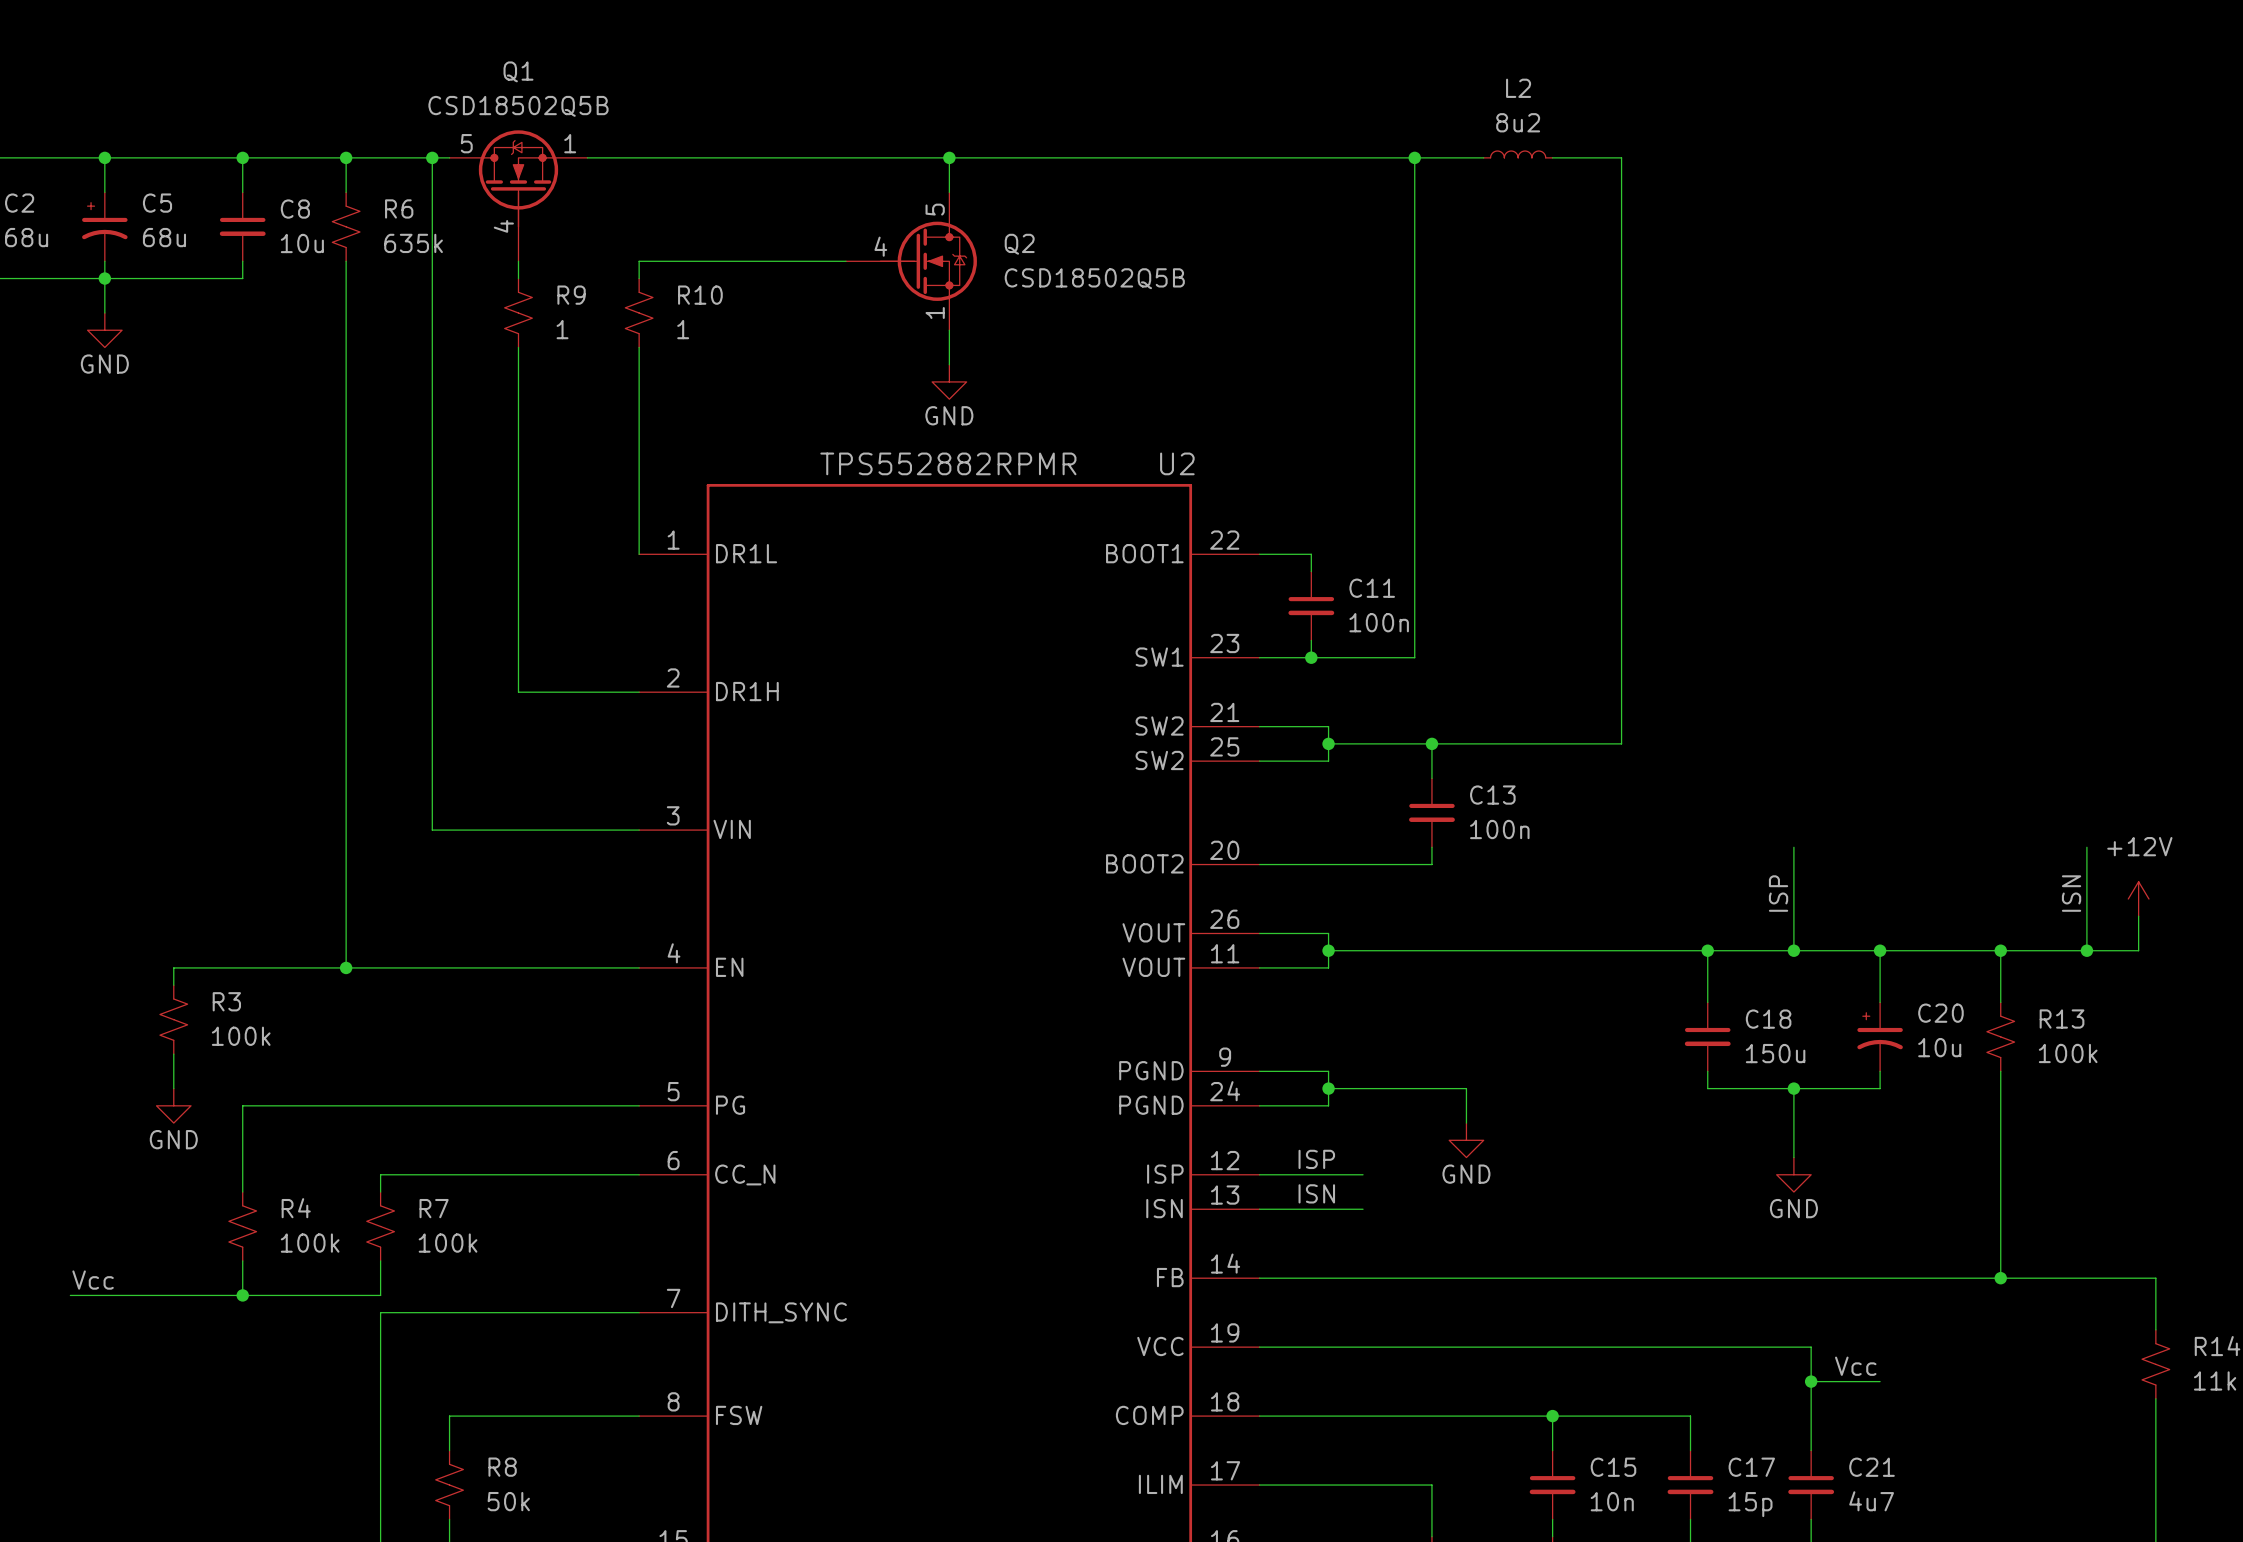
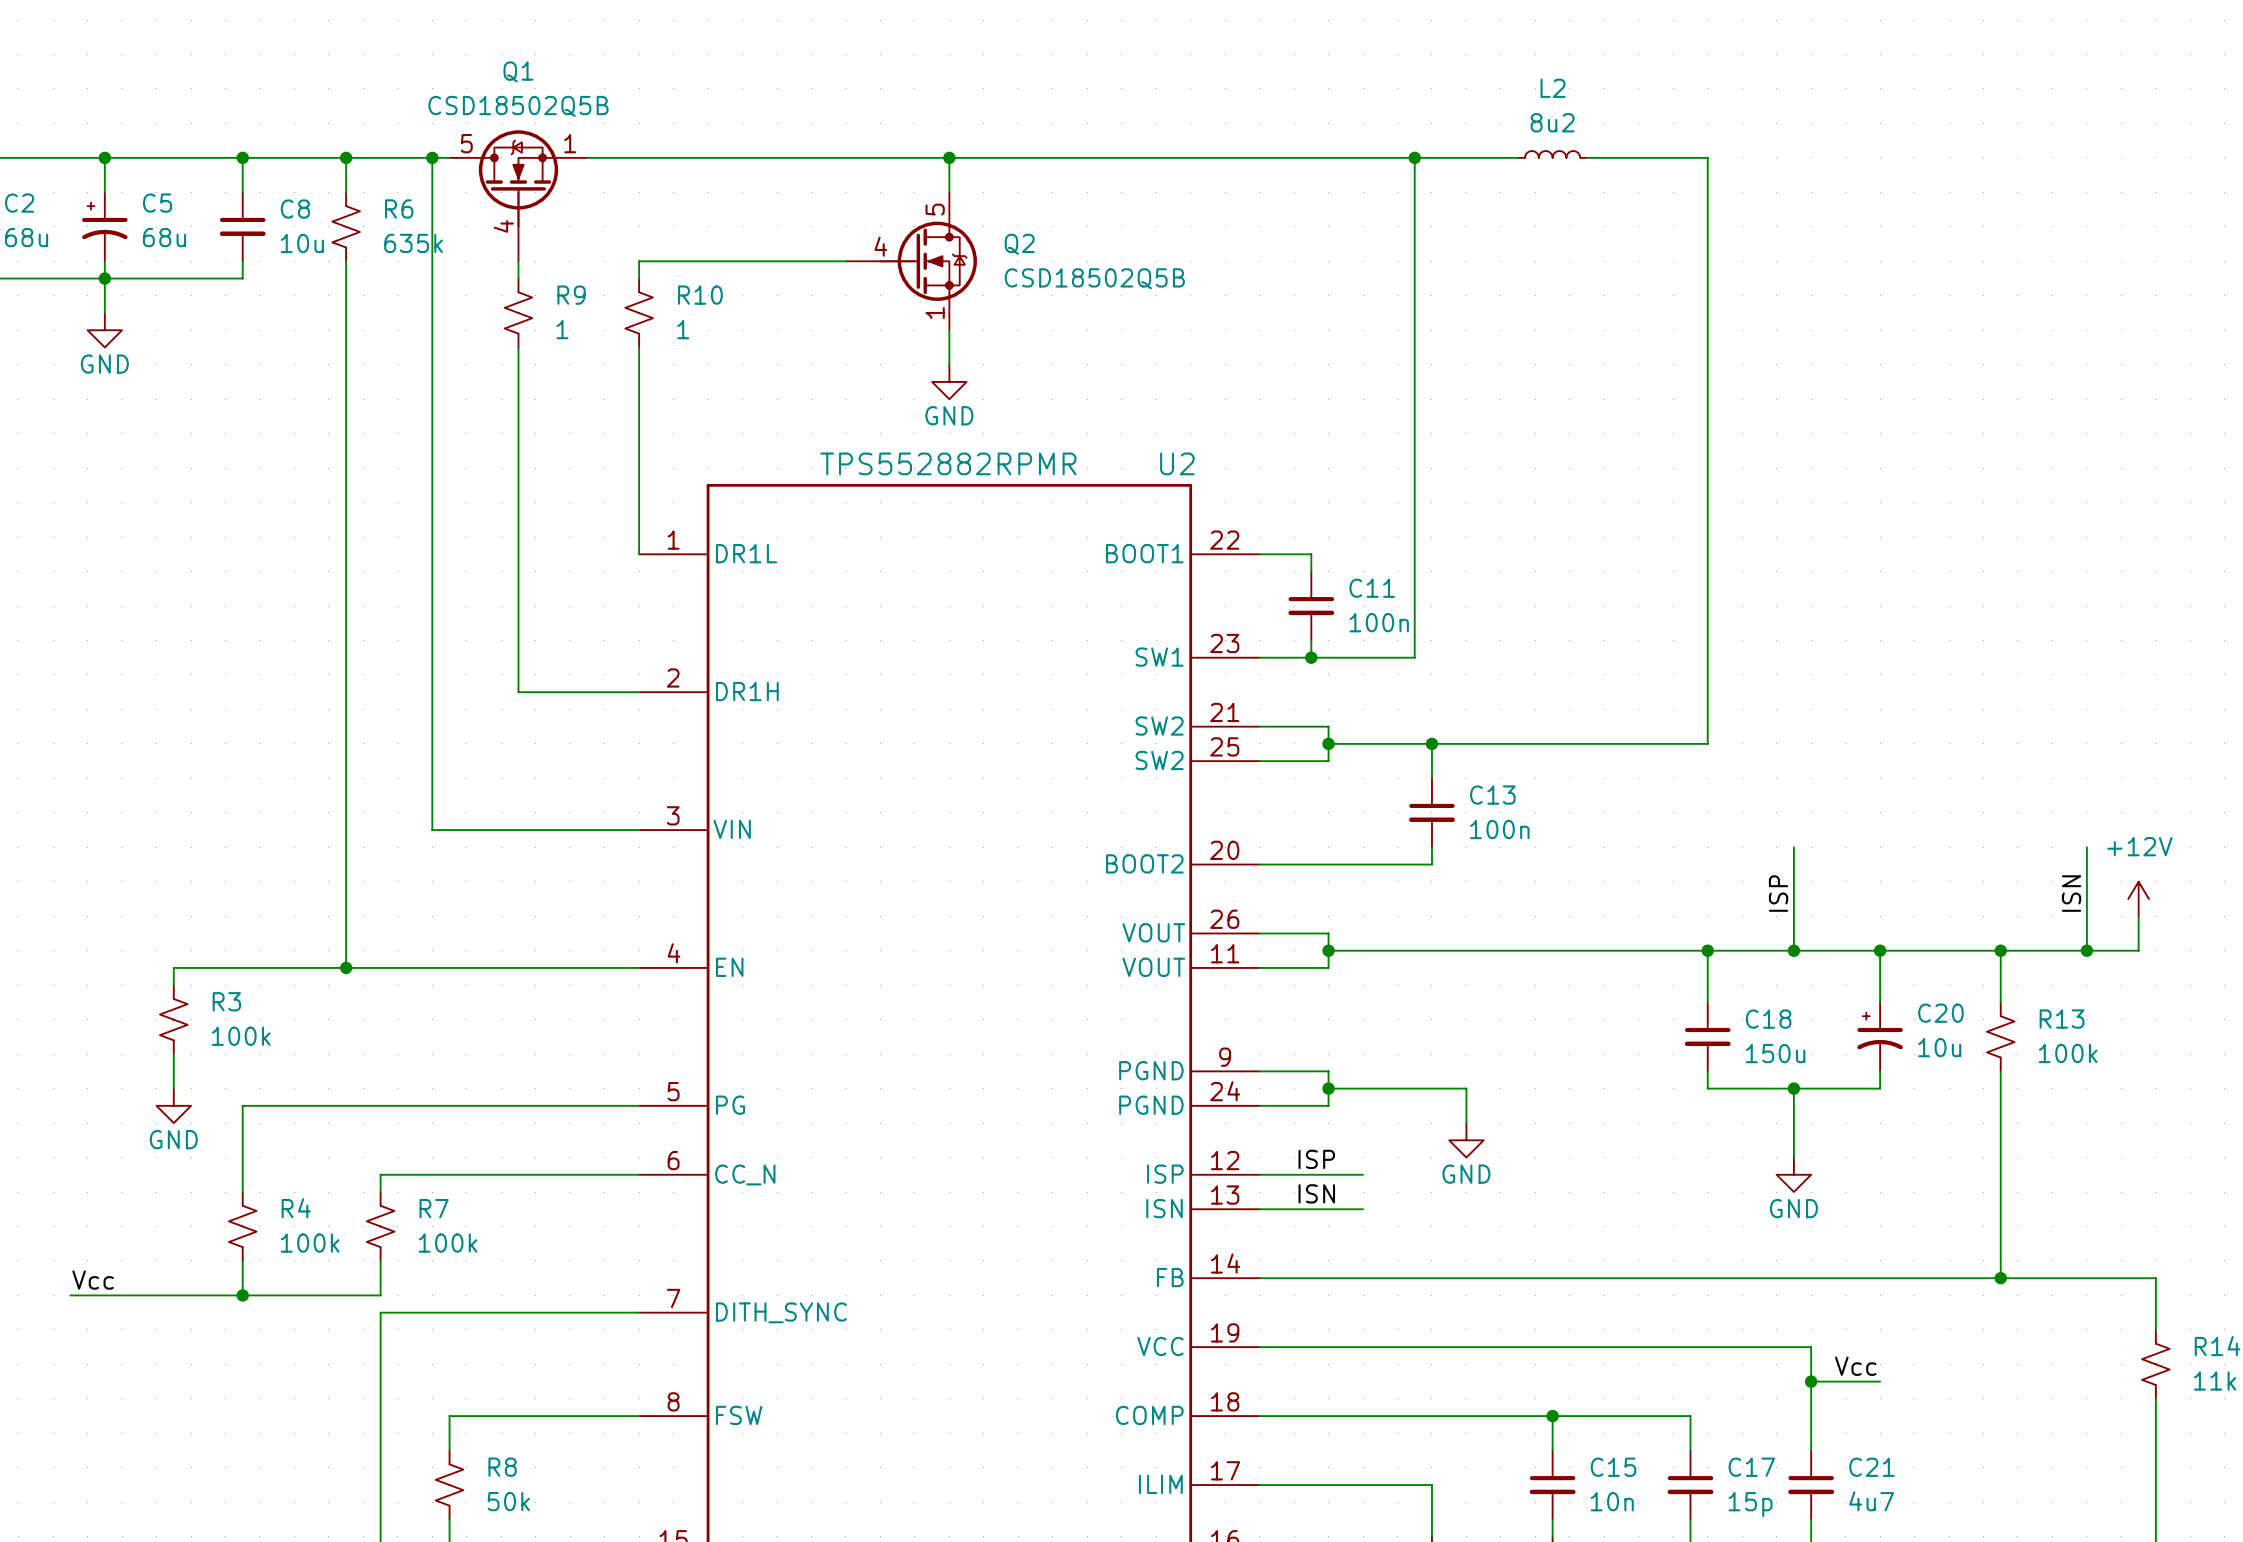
L2 position: (1518, 154) -> (1552, 154)
wire: (1552, 157) (1587, 157) -> (1483, 157) (1518, 157)
wire: (1621, 157) (1621, 743) -> (1621, 157) (1707, 157) (1707, 743) (1621, 743)

